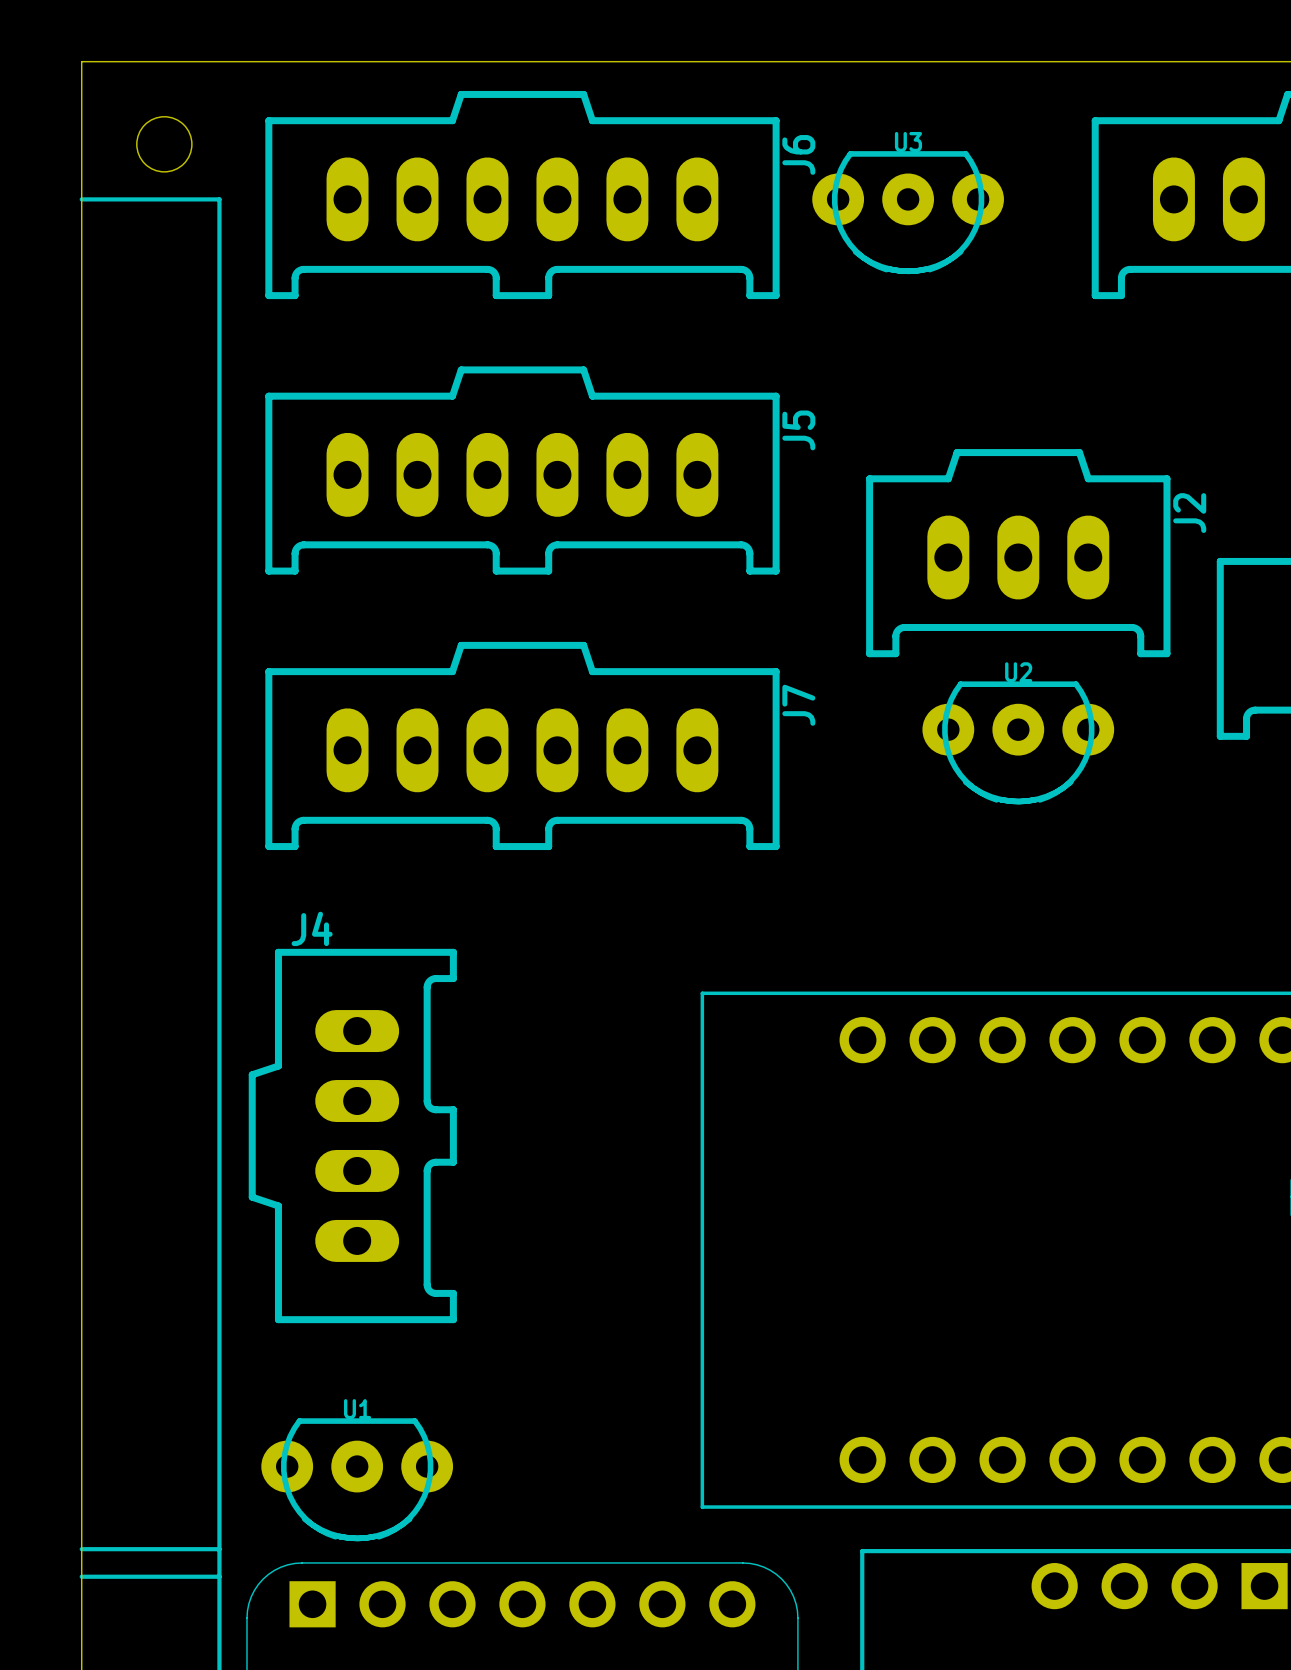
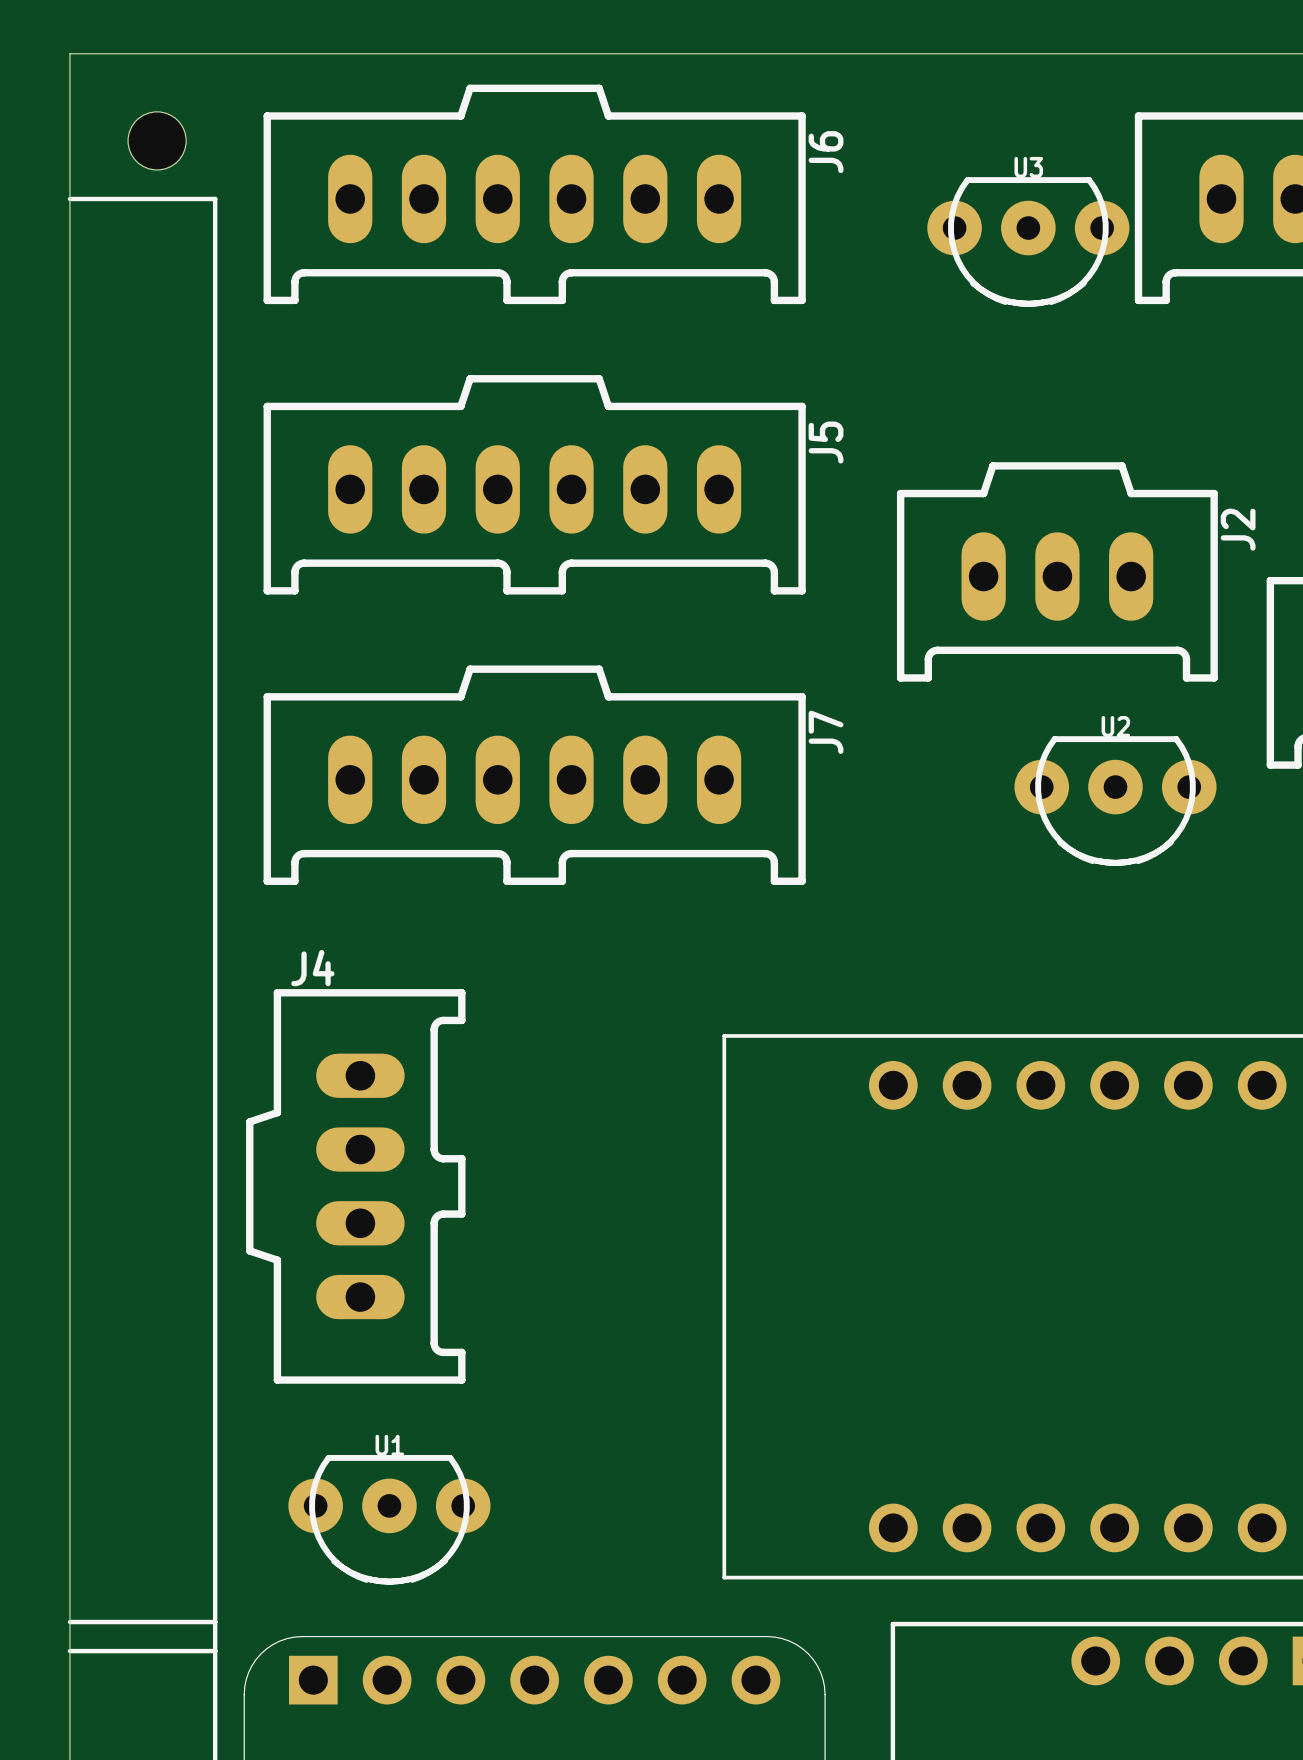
U3 position: (908, 212) -> (1028, 241)
U2 position: (1018, 742) -> (1115, 801)
U1 position: (357, 1479) -> (389, 1519)

